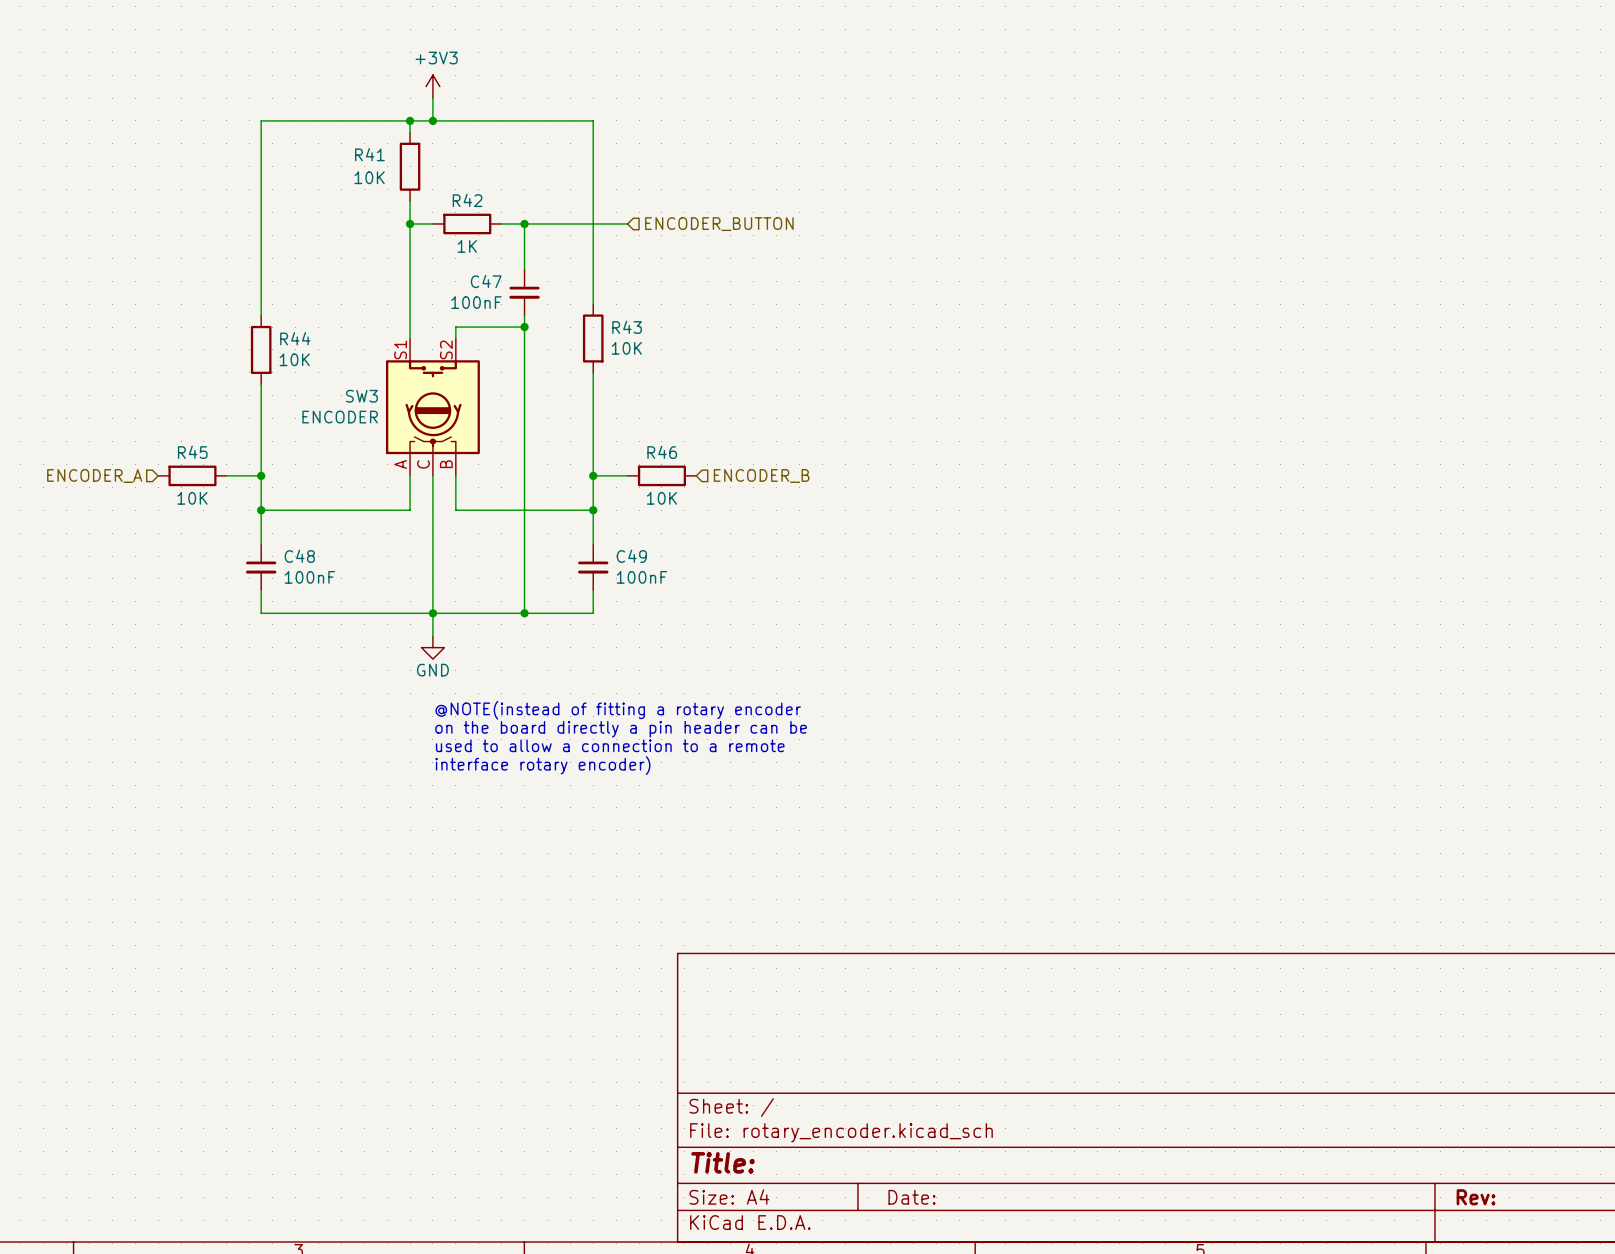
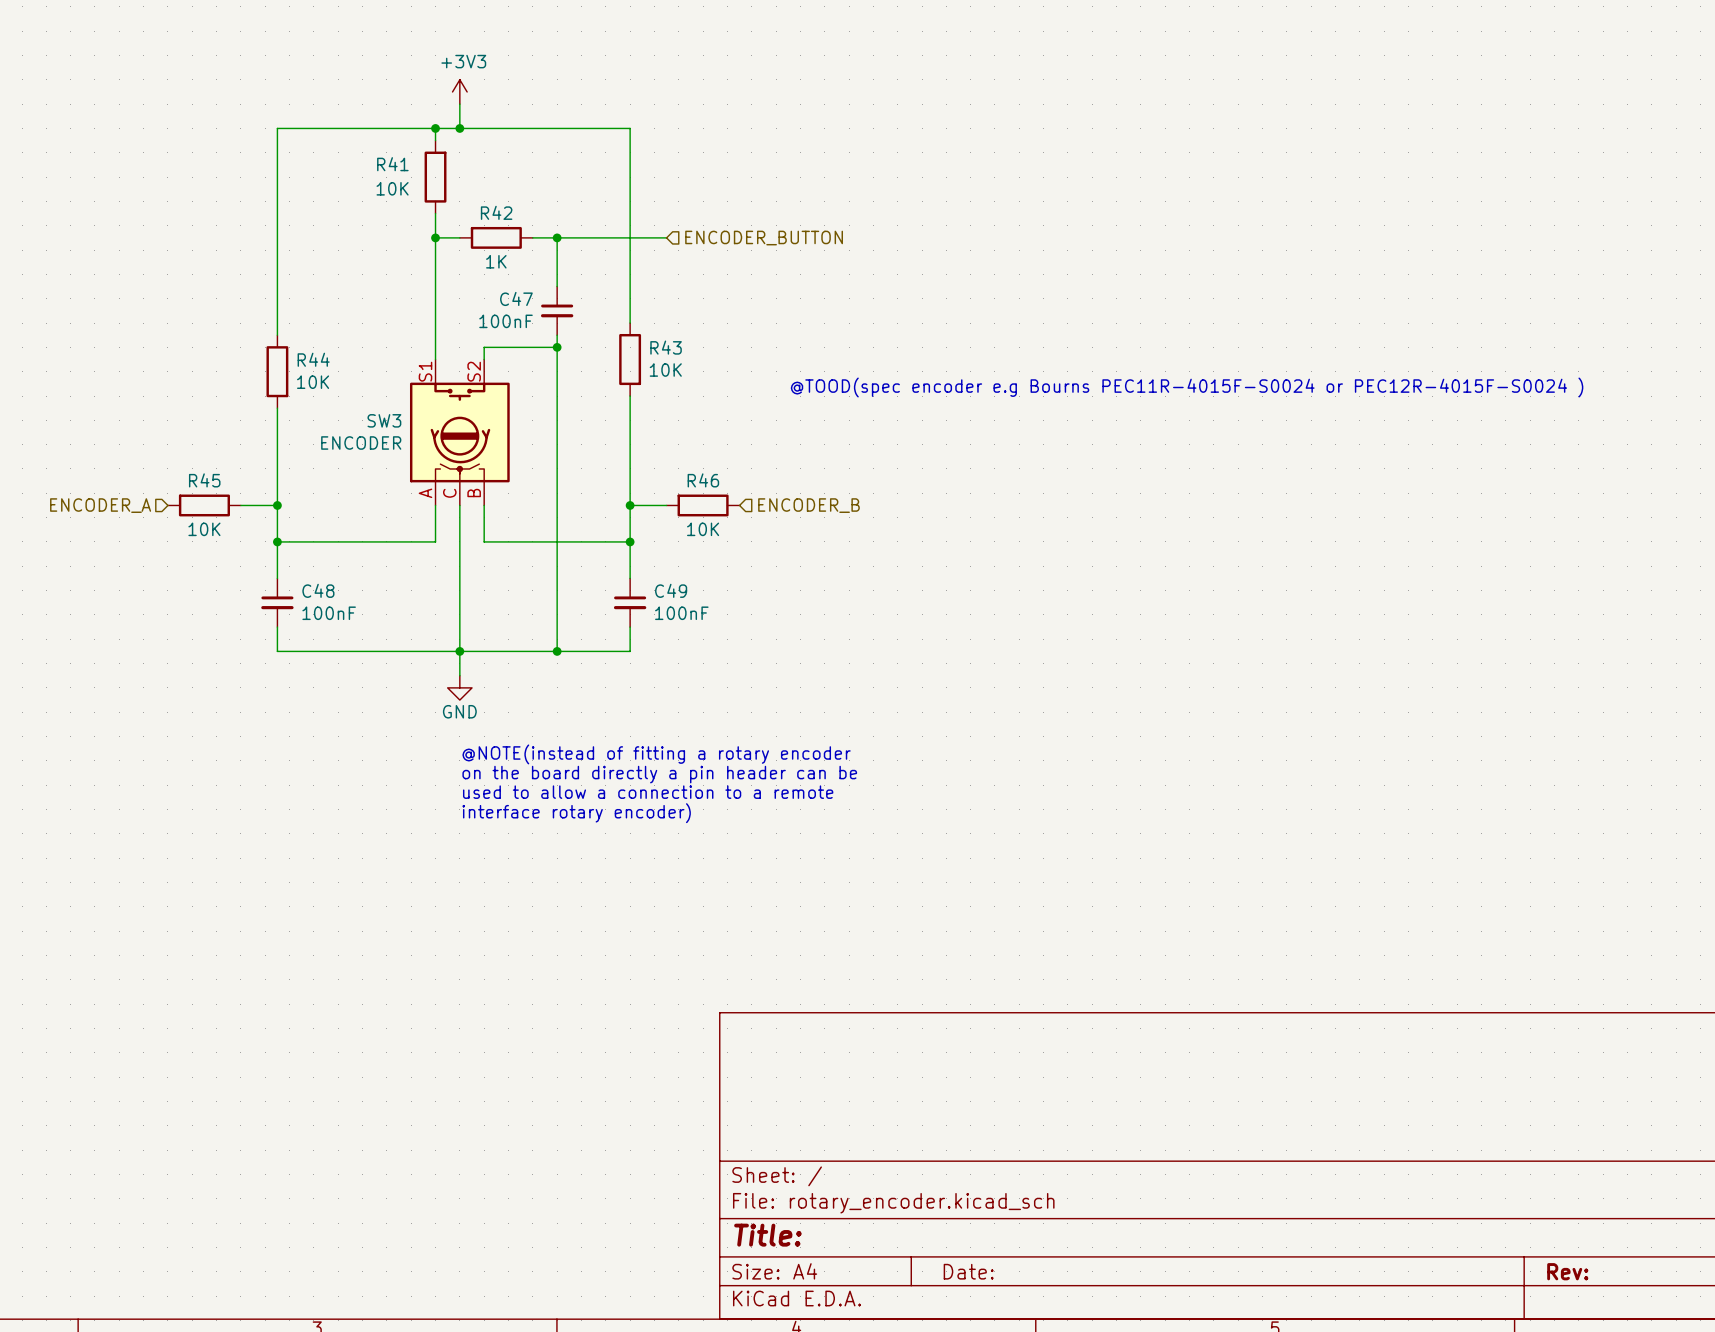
text: none -> @TOOD(spec encoder e.g Bourns PEC11R-4015F-S0024 or PEC12R-4015F-S0024 ) (1187, 387)

